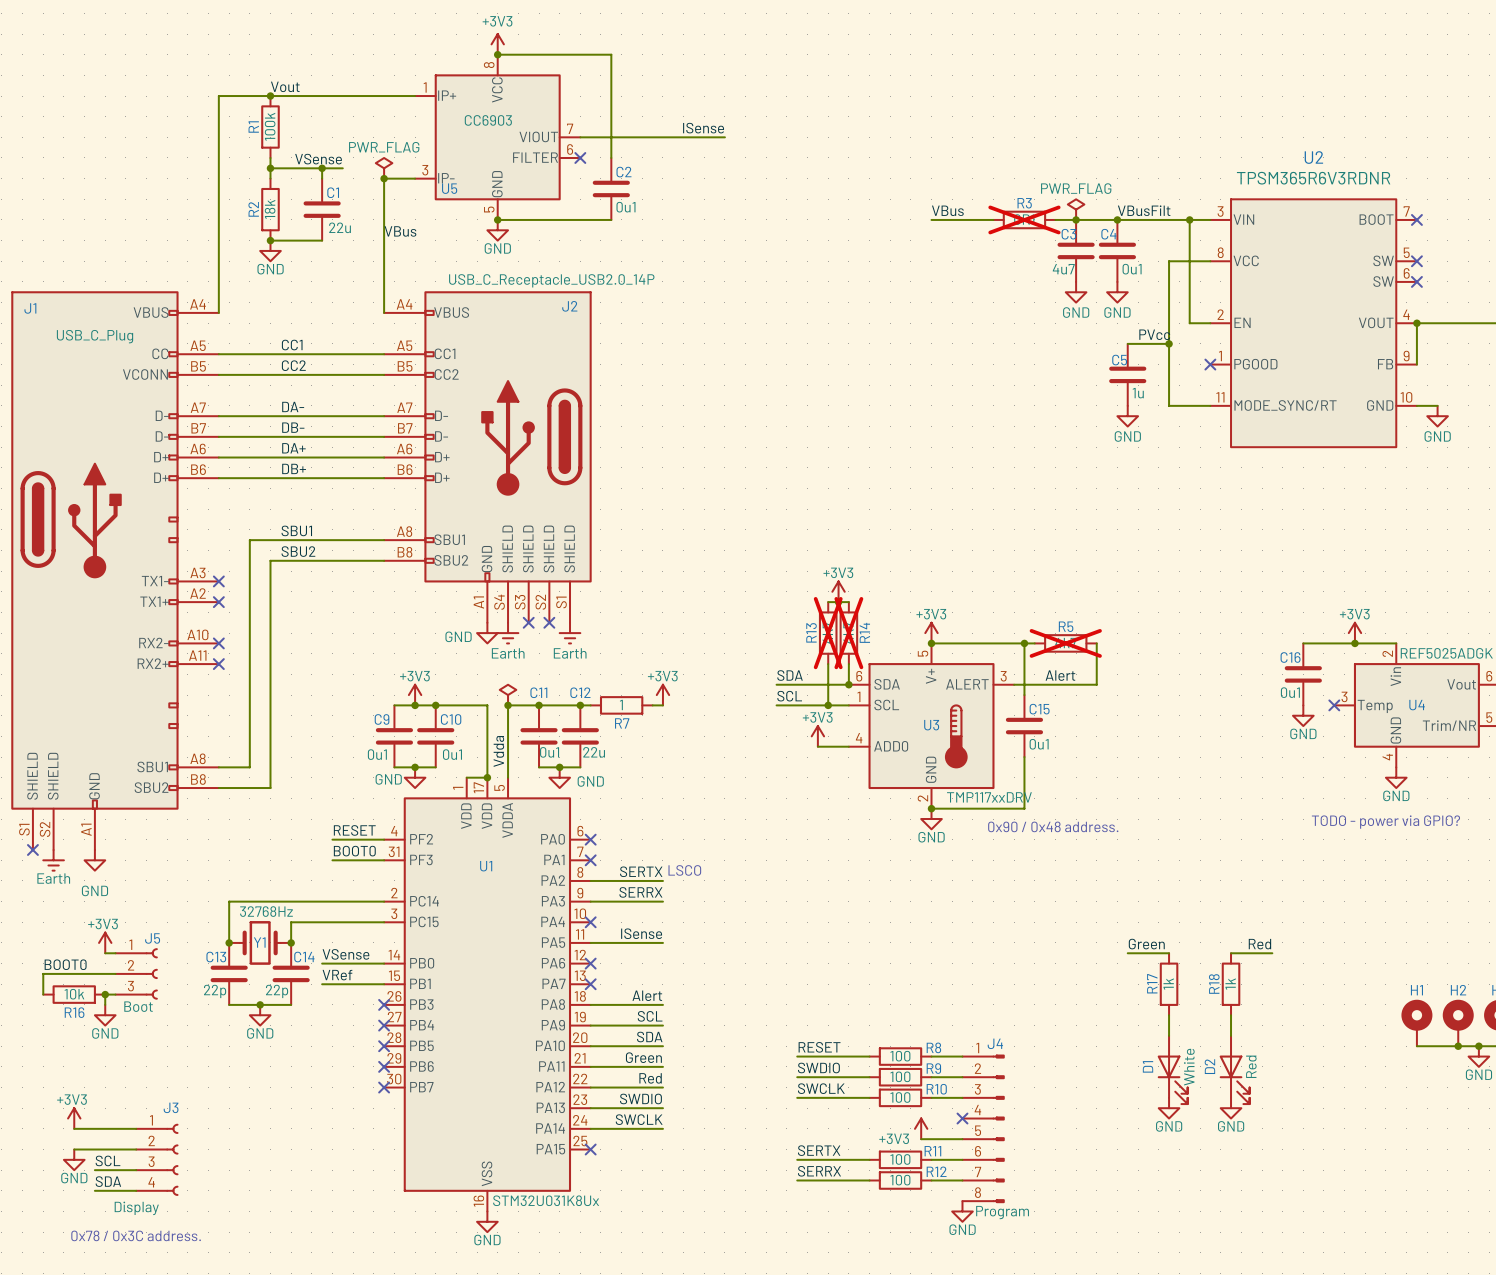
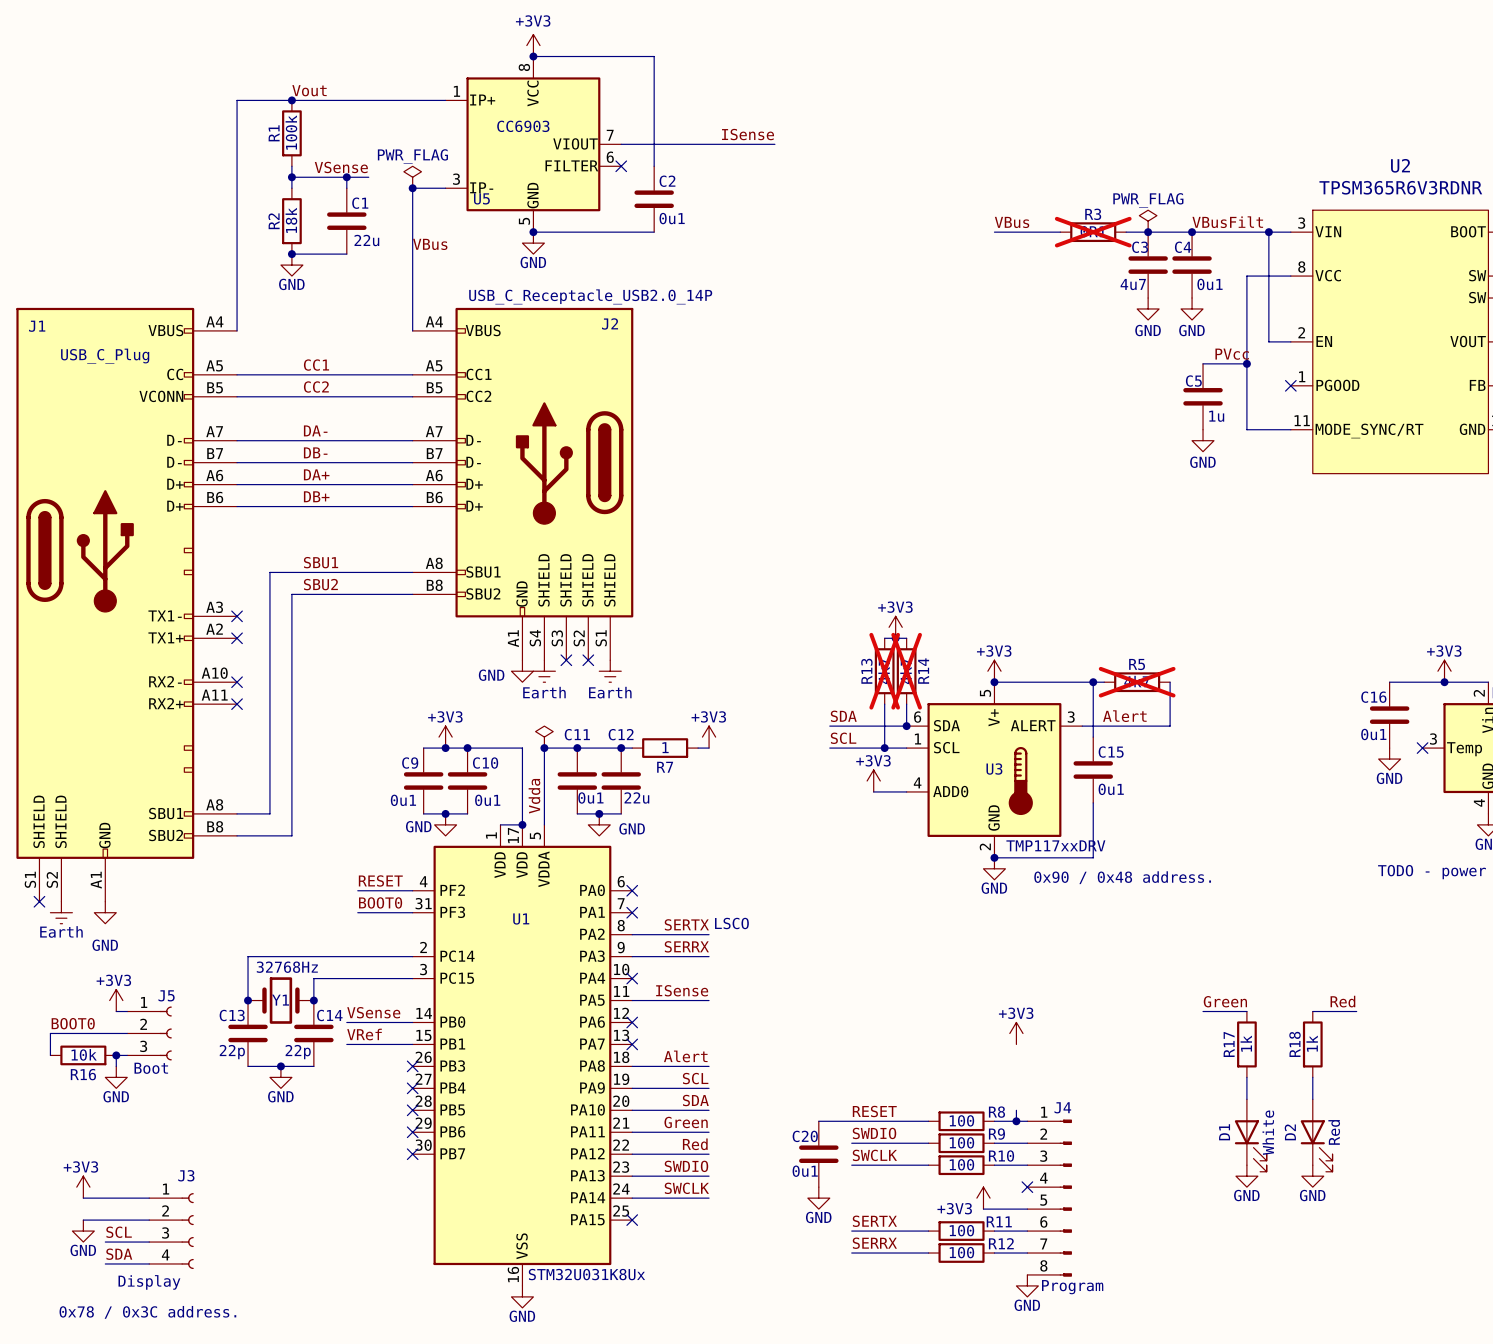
power symbol: none -> +3V3 (1016, 1033)
wire: none -> (1016, 1110) (1016, 1121)
wire: none -> (818, 1121) (851, 1121)
junction: none -> (1016, 1121)
C20: none -> 0u1 (818, 1154)
power symbol: none -> GND (818, 1198)

